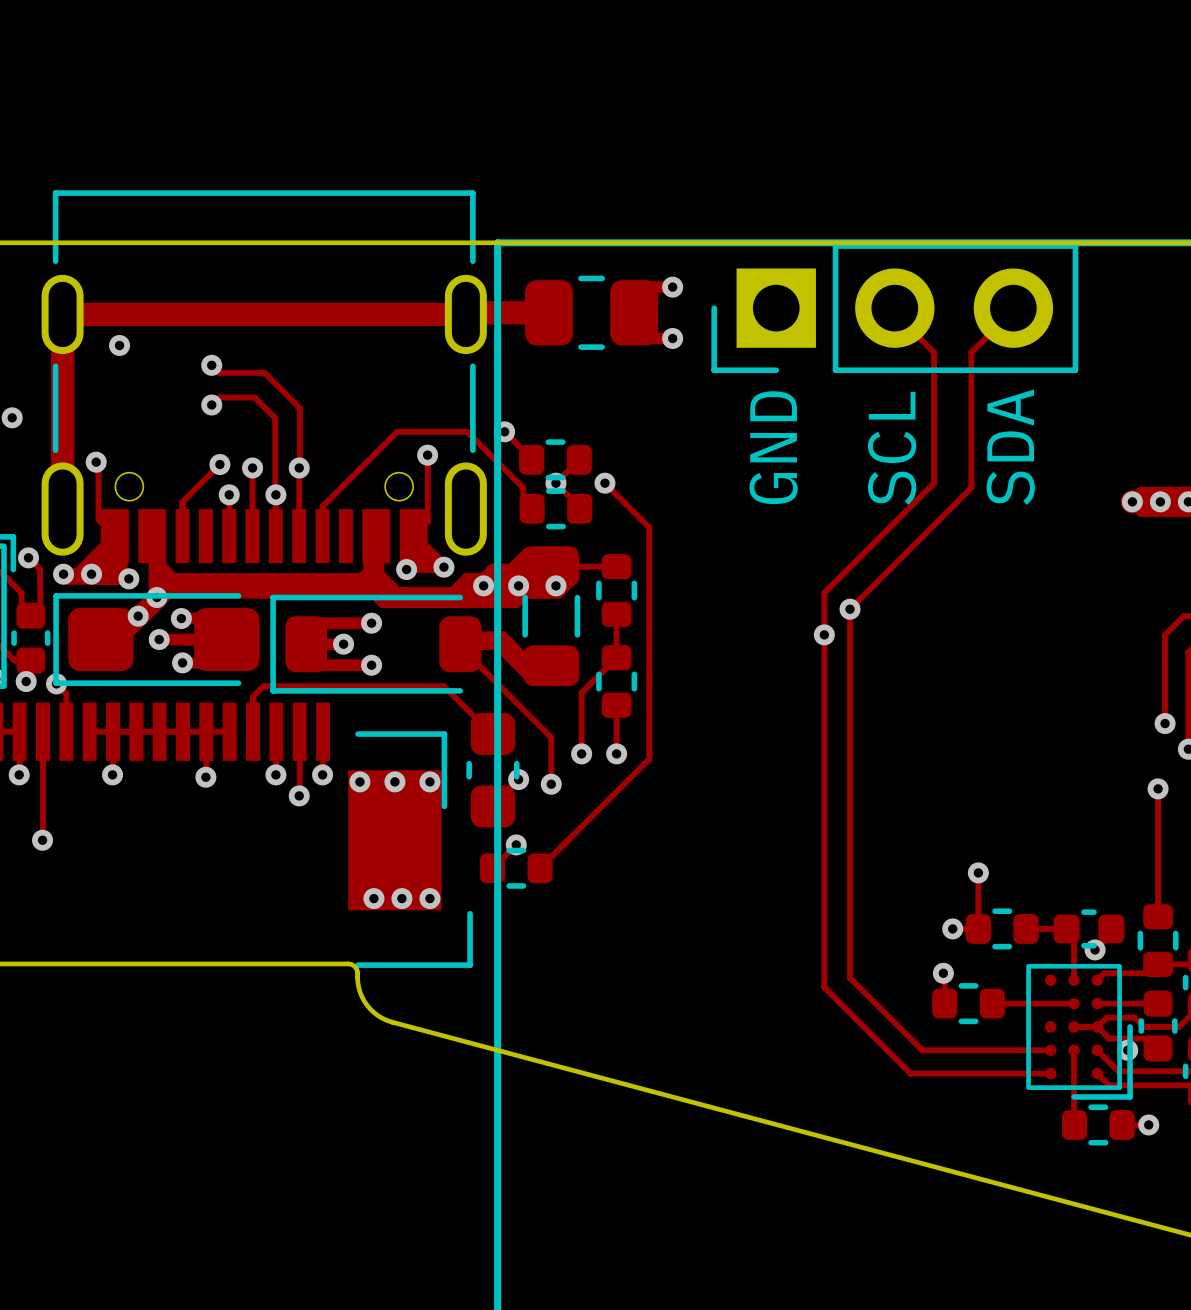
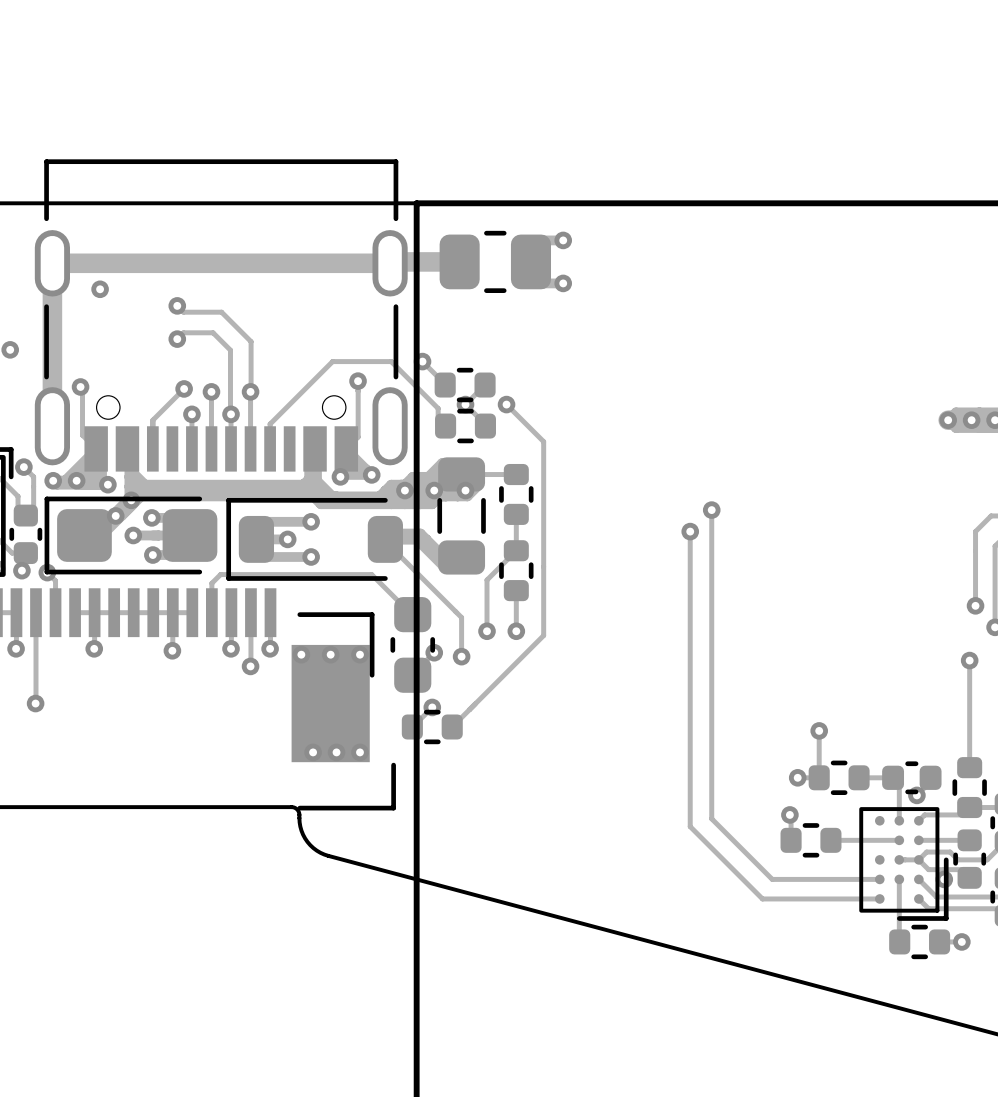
part: (894, 308) -> none
track: (1013, 310) (971, 352) (971, 487) (850, 609) -> none
track: (894, 313) (934, 352) (934, 483) (824, 592) (824, 634) -> none
text: GND (773, 447) -> none
text: SDA (1010, 447) -> none
text: SCL (892, 448) -> none

